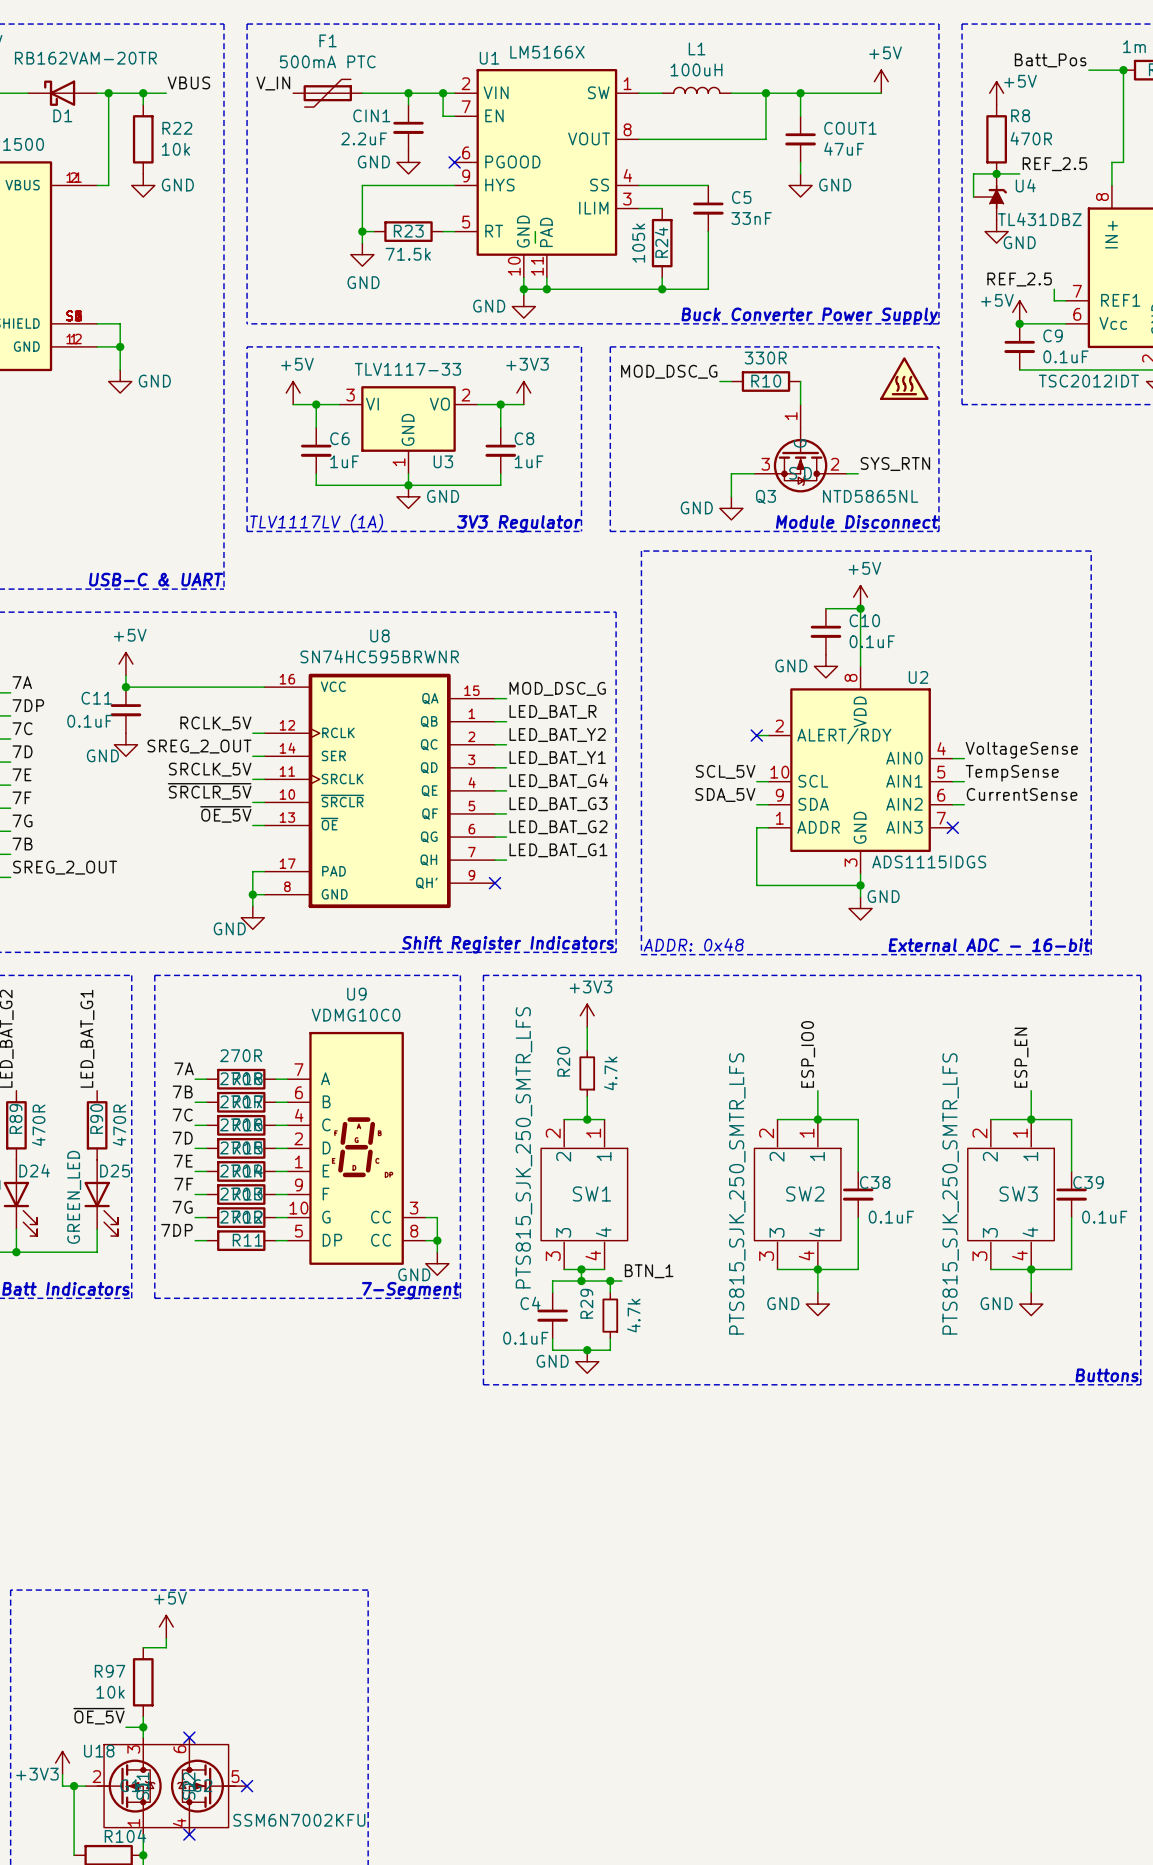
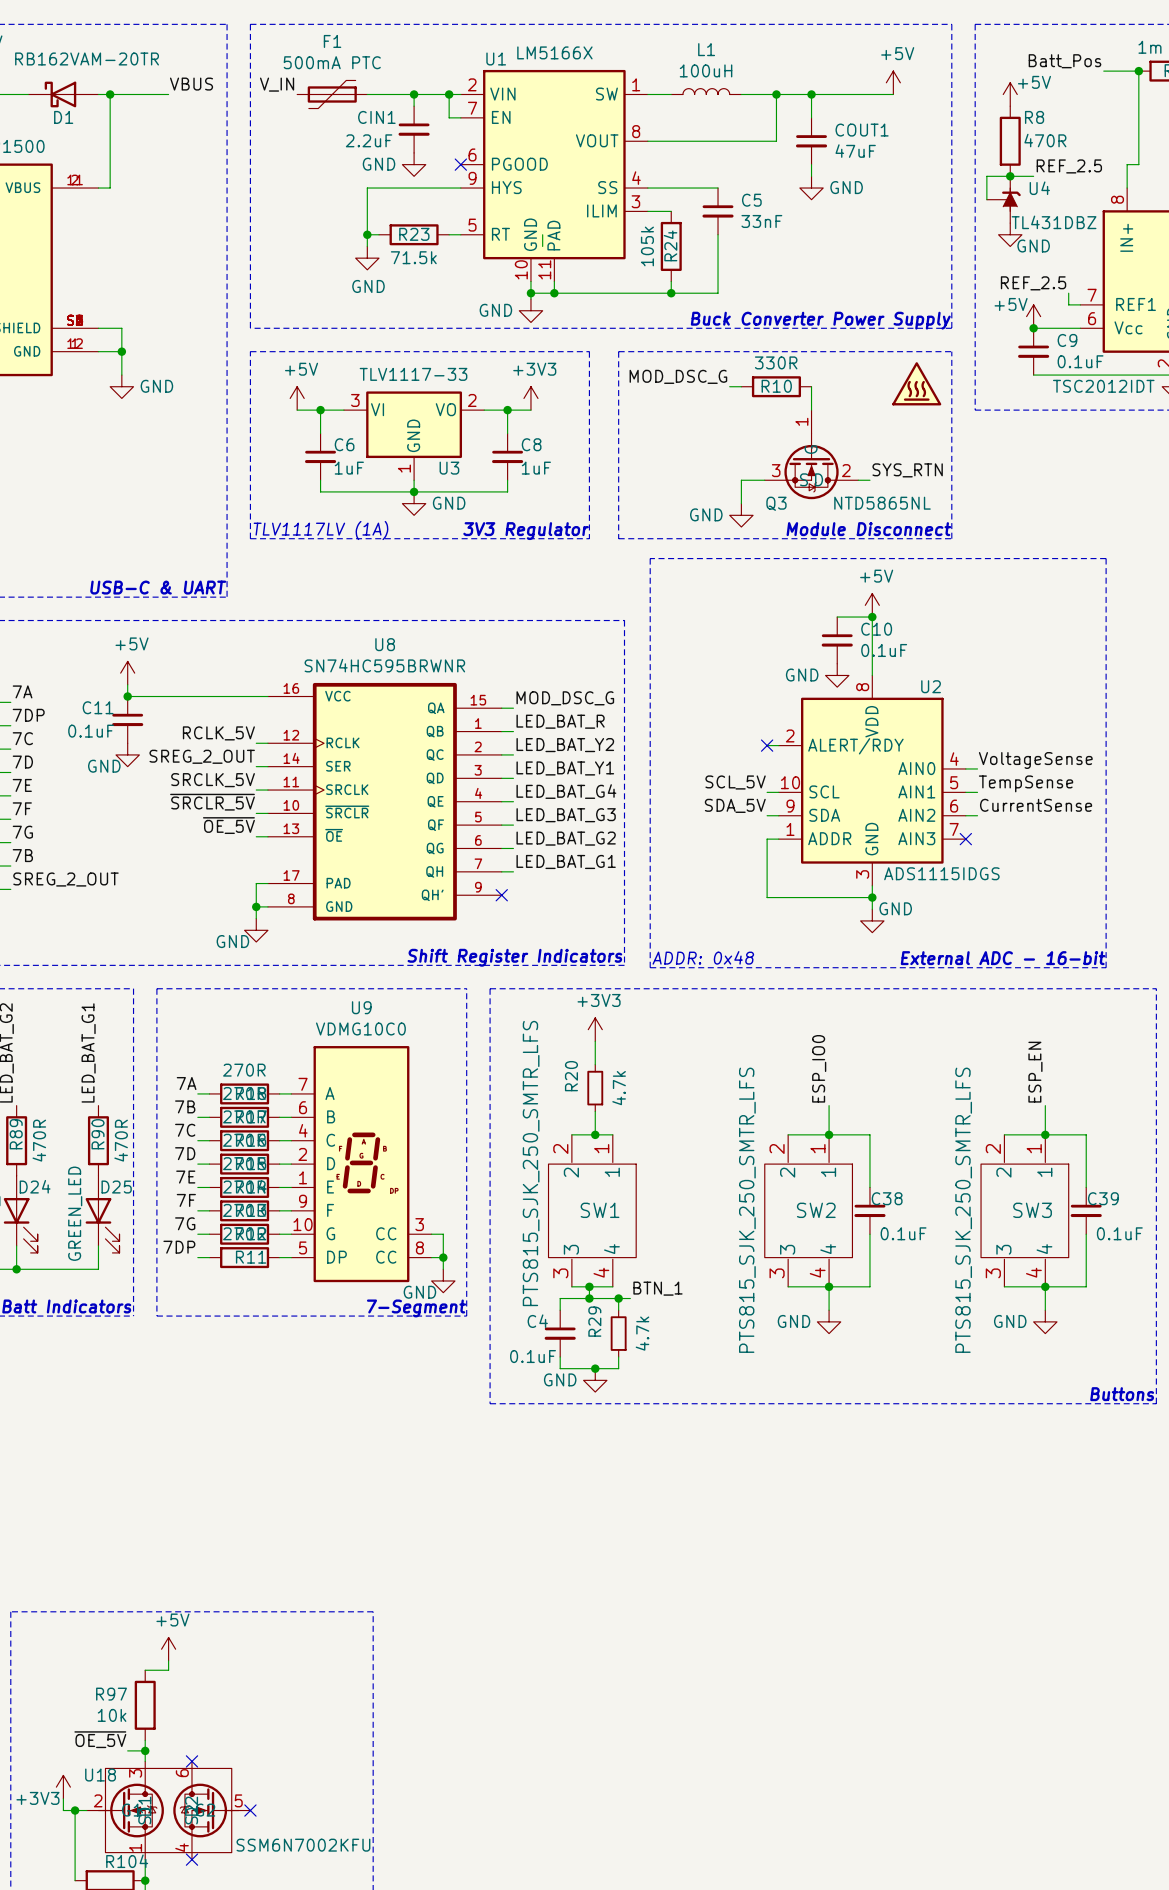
wire: (143, 93) (143, 104) -> none
junction: (143, 93) -> none
R22: 10k (143, 139) -> none
power symbol: GND (143, 185) -> none

